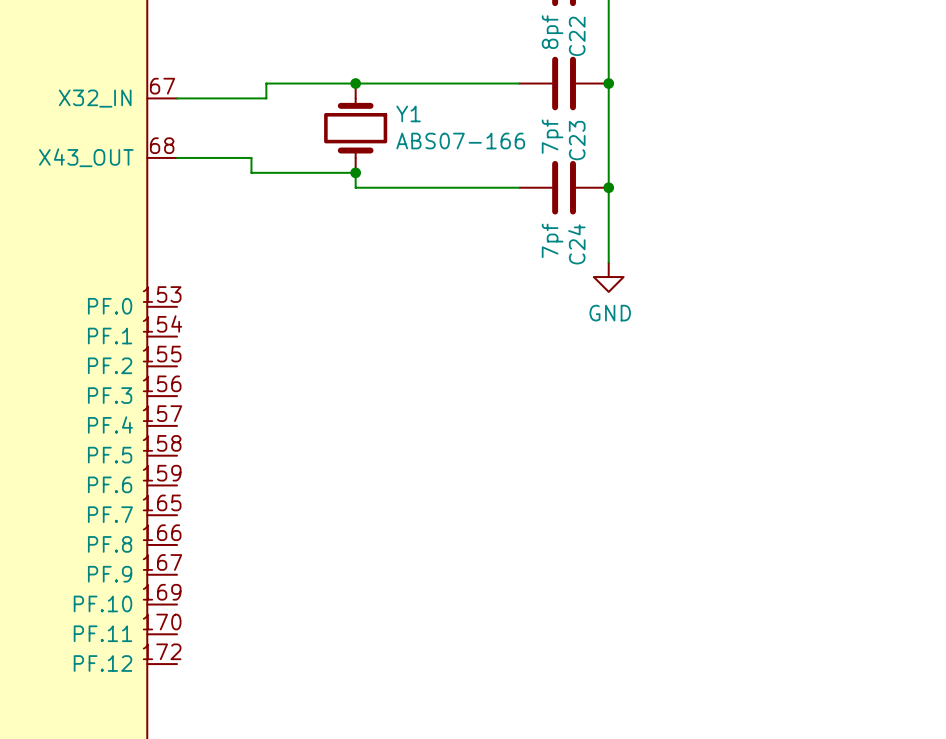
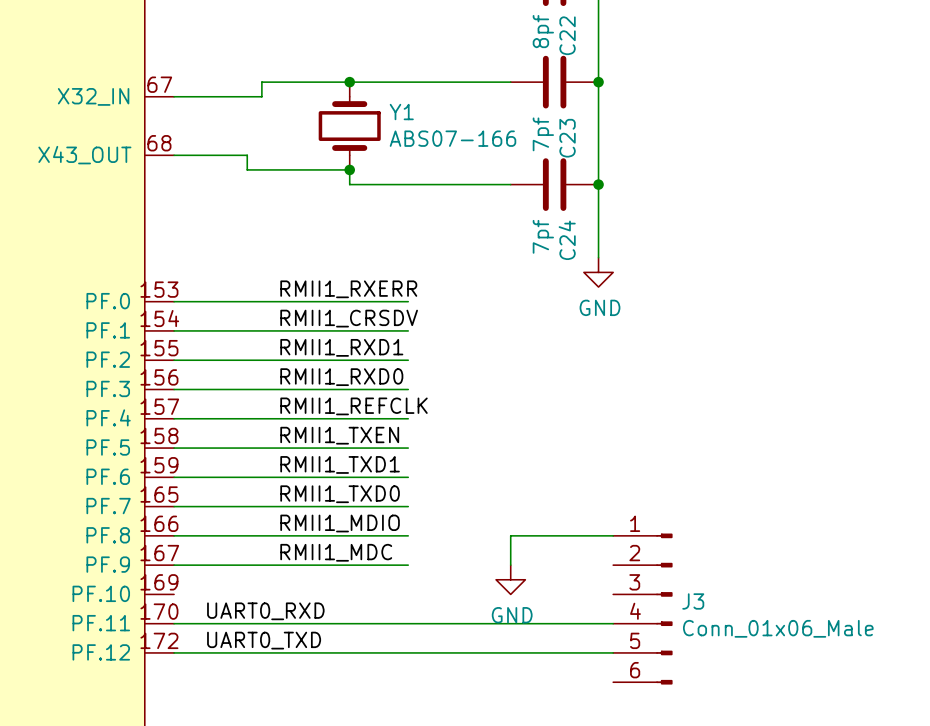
label: none -> RMII1_RXERR (348, 289)
wire: none -> (174, 301) (408, 301)
label: none -> RMII1_CRSDV (349, 318)
wire: none -> (174, 330) (408, 330)
label: none -> RMII1_RXD1 (341, 347)
wire: none -> (174, 360) (408, 360)
label: none -> RMII1_RXD0 (341, 377)
wire: none -> (174, 389) (408, 389)
label: none -> RMII1_REFCLK (354, 406)
wire: none -> (174, 418) (408, 418)
label: none -> RMII1_TXEN (339, 435)
wire: none -> (174, 448) (408, 448)
label: none -> RMII1_TXD1 (340, 464)
wire: none -> (174, 477) (408, 477)
label: none -> RMII1_TXD0 (340, 494)
wire: none -> (174, 506) (408, 506)
label: none -> RMII1_MDIO (340, 523)
wire: none -> (174, 535) (408, 535)
wire: none -> (613, 535) (510, 535) (510, 565)
label: none -> RMII1_MDC (336, 552)
wire: none -> (174, 565) (408, 565)
power symbol: none -> GND (510, 579)
J3: none -> Conn_01x06_Male (642, 609)
label: none -> UART0_RXD (265, 611)
wire: none -> (174, 623) (613, 623)
label: none -> UART0_TXD (264, 640)
wire: none -> (174, 652) (613, 652)

